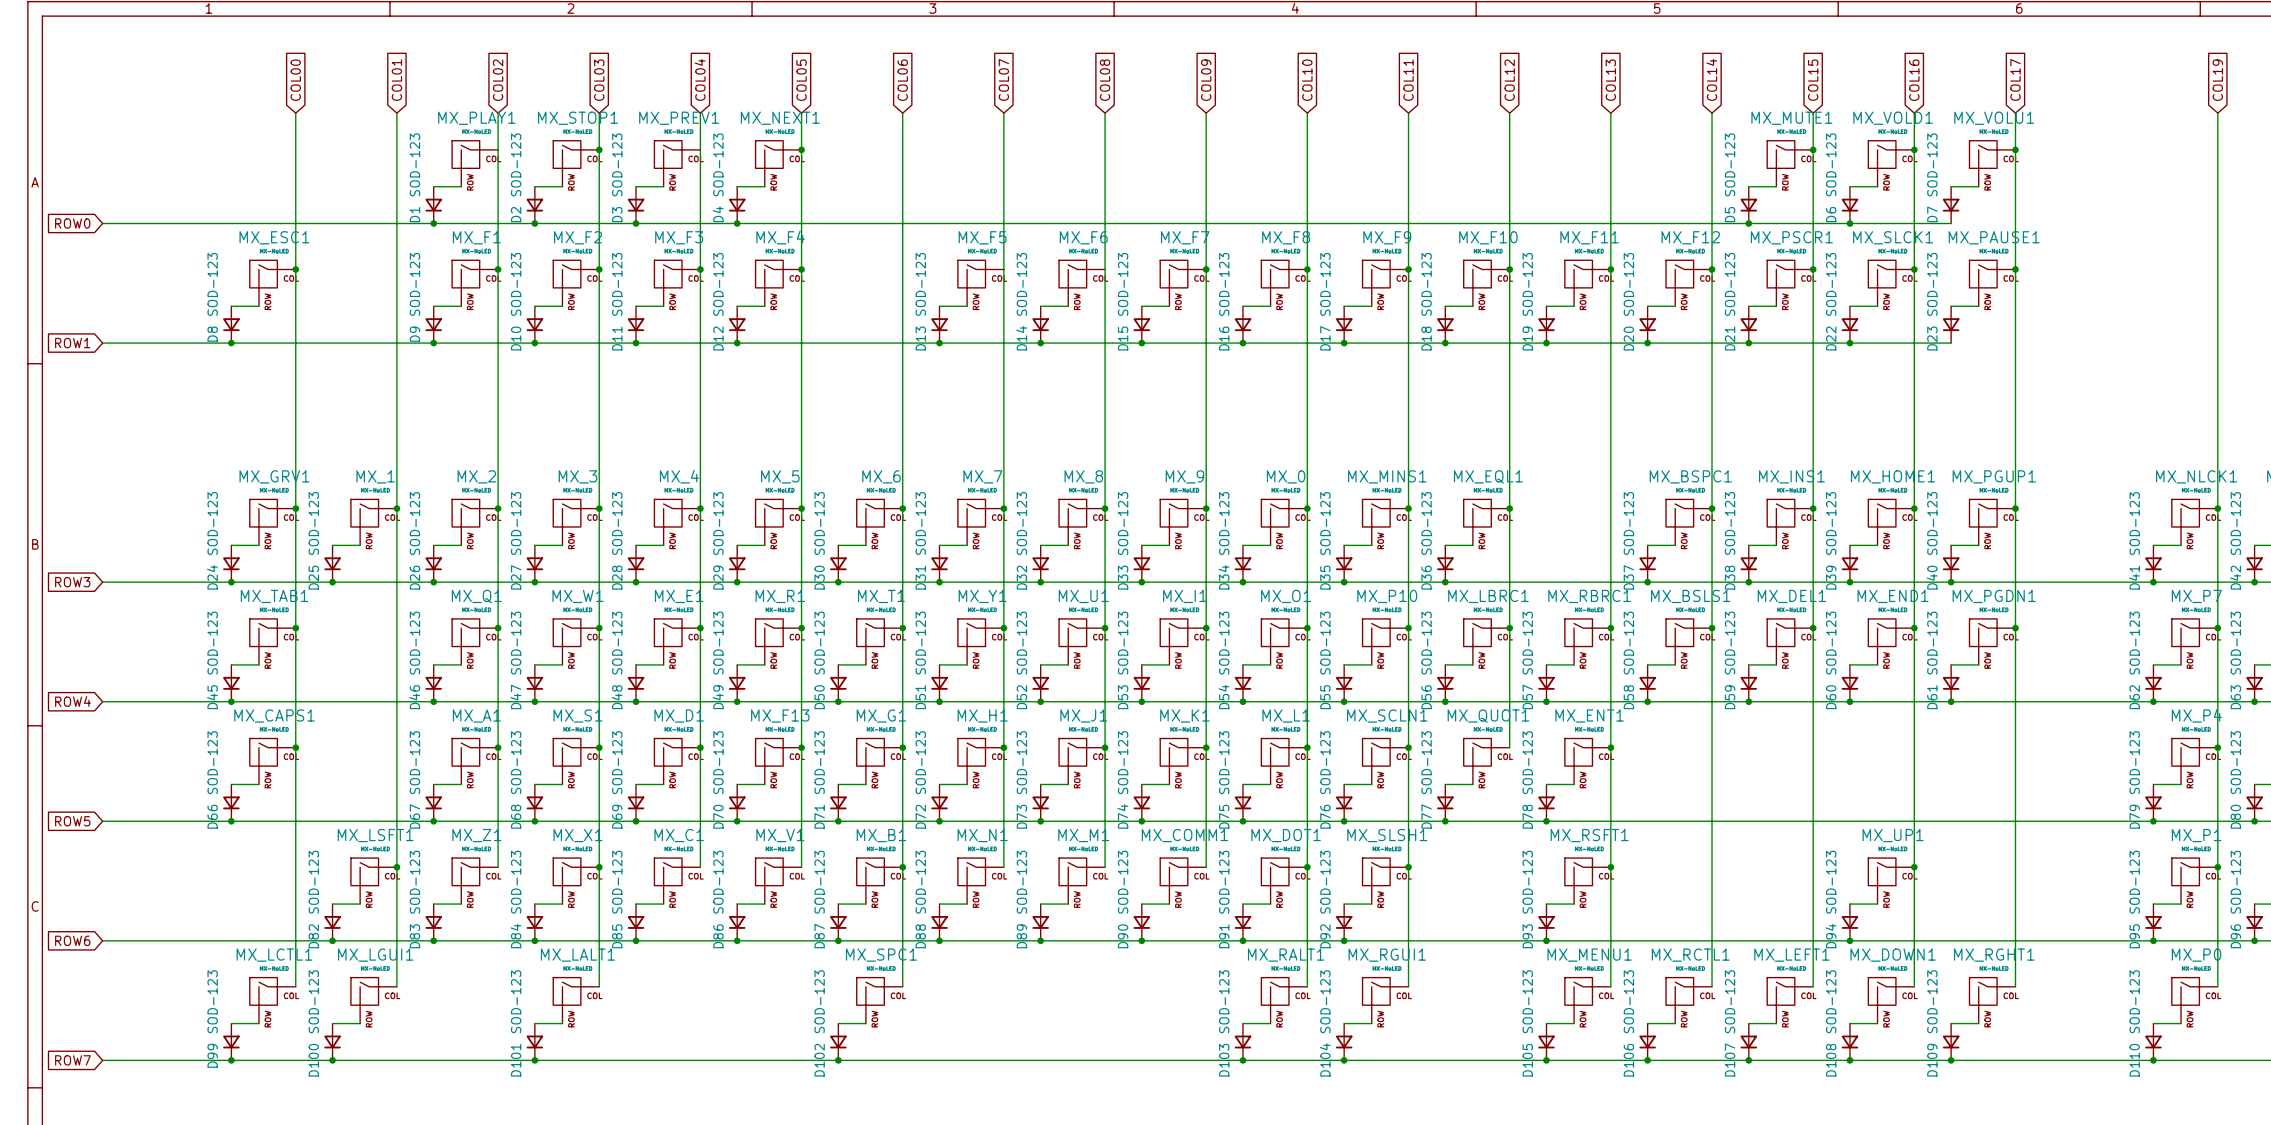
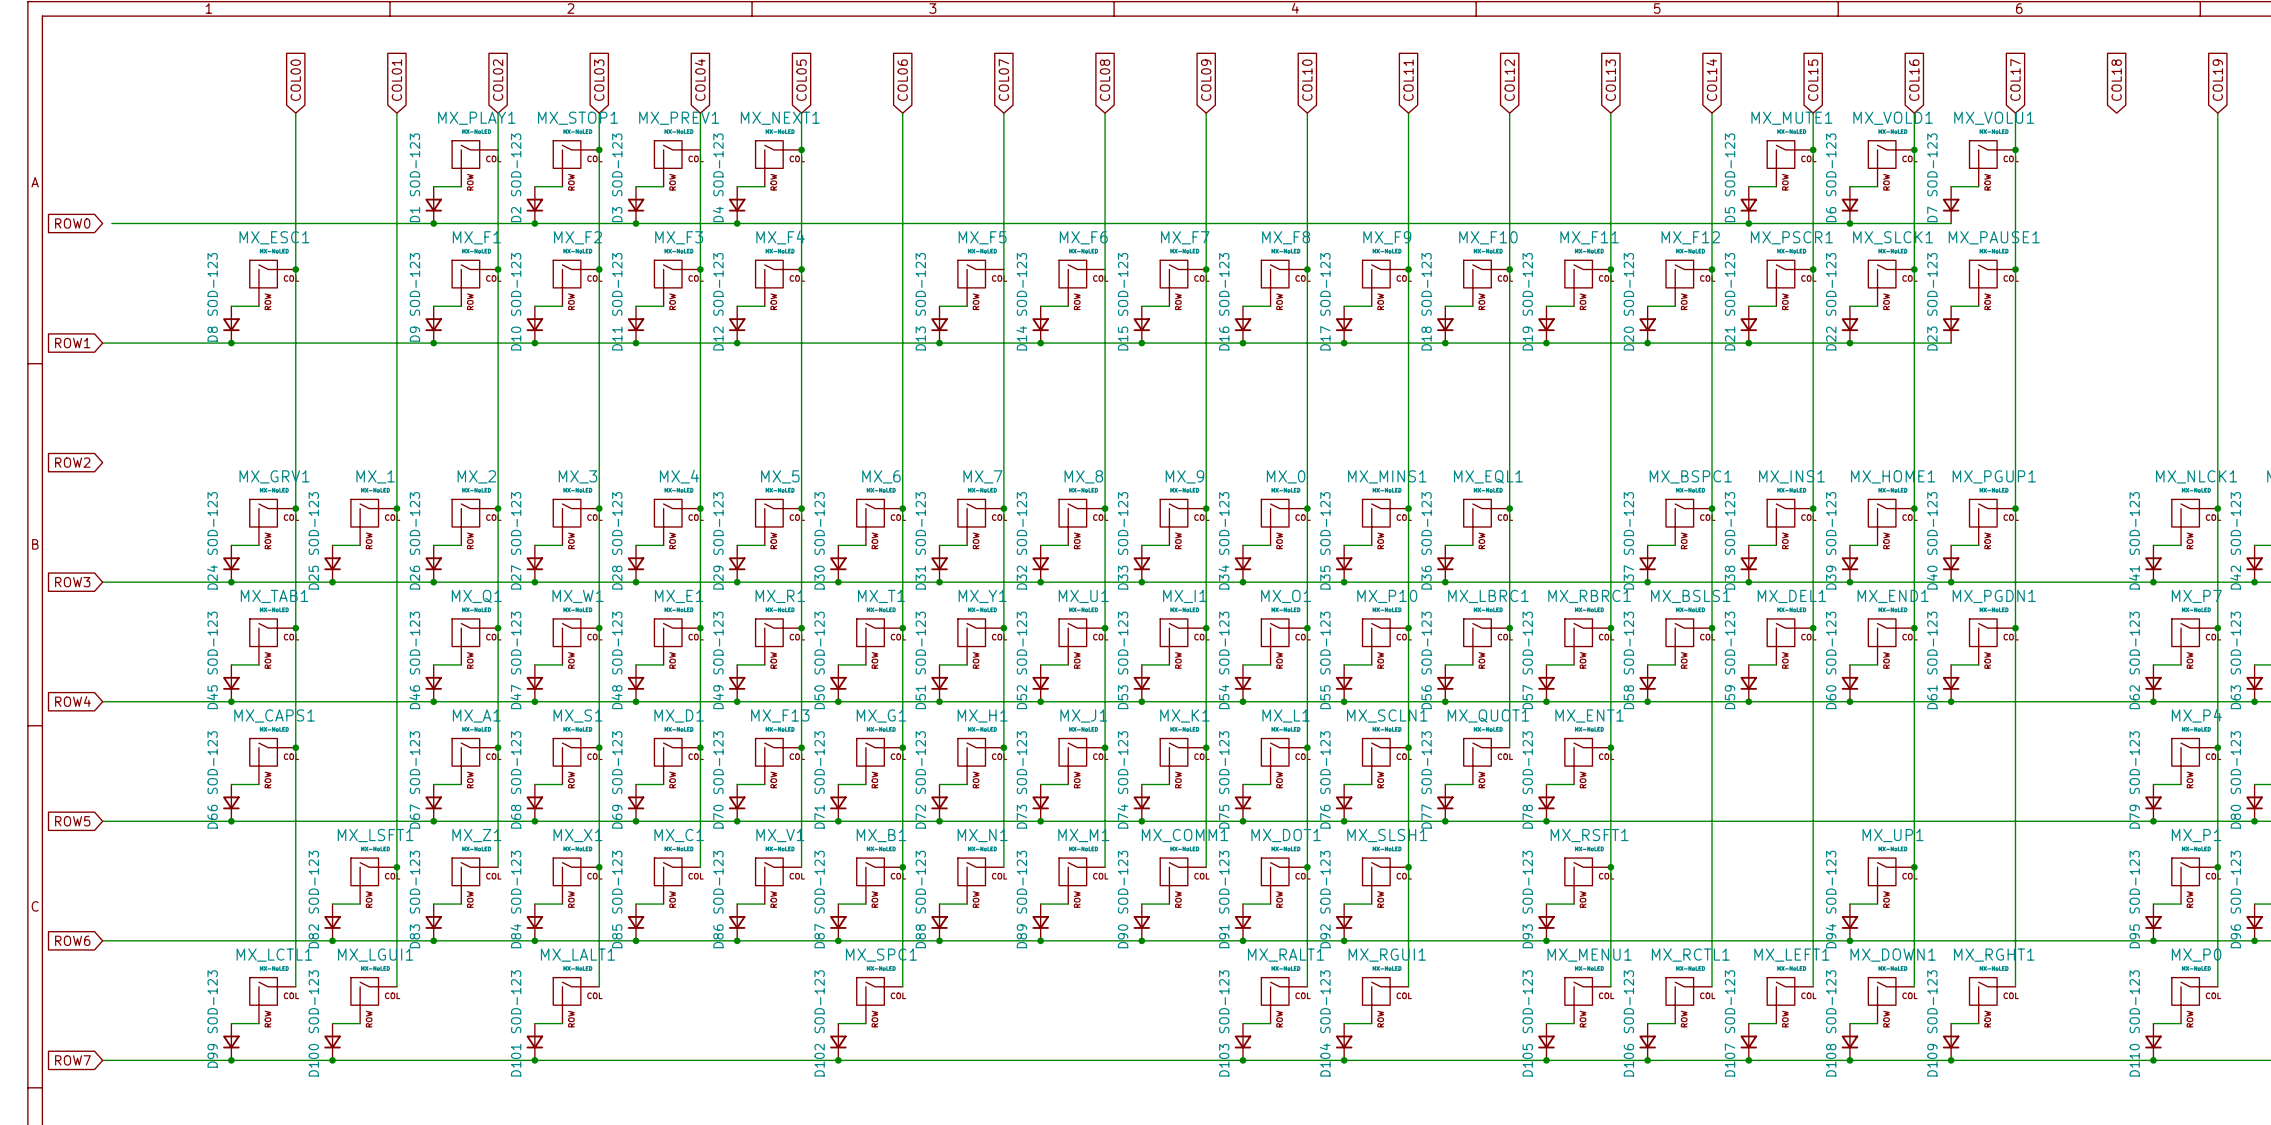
global label: none -> COL18 (2116, 80)
wire: (102, 223) (111, 223) -> none
global label: none -> ROW2 (72, 462)

